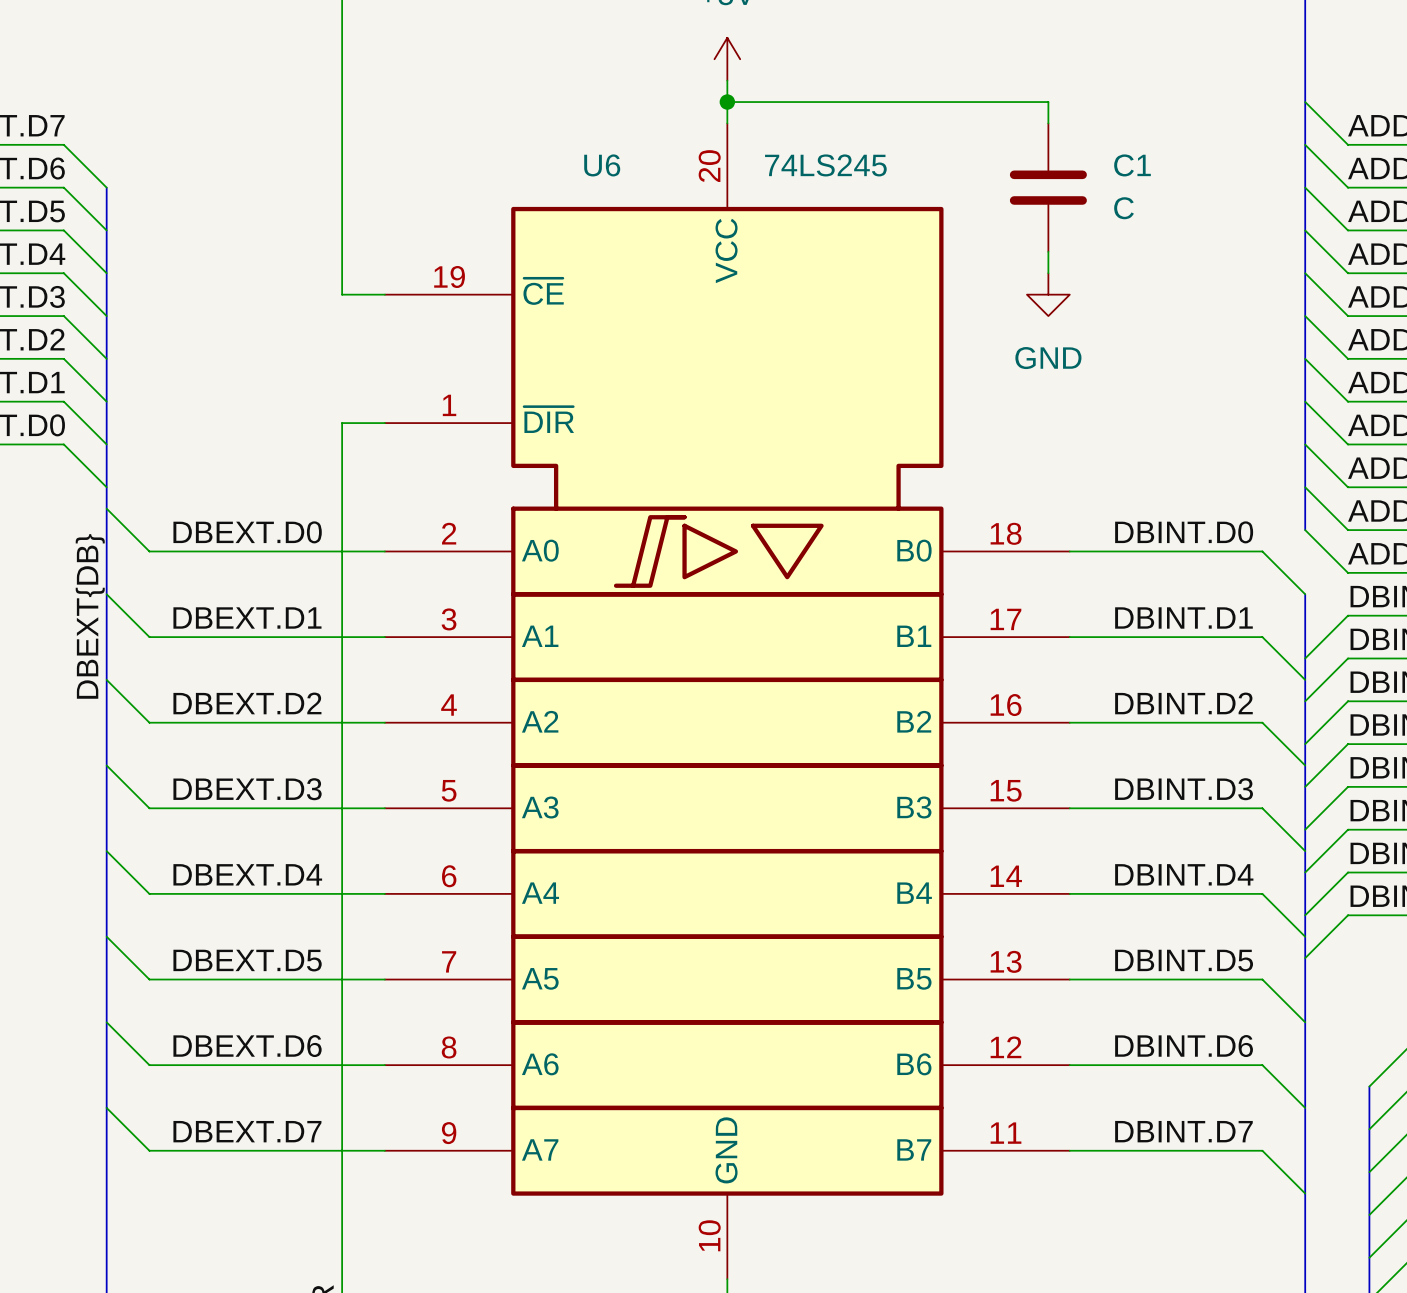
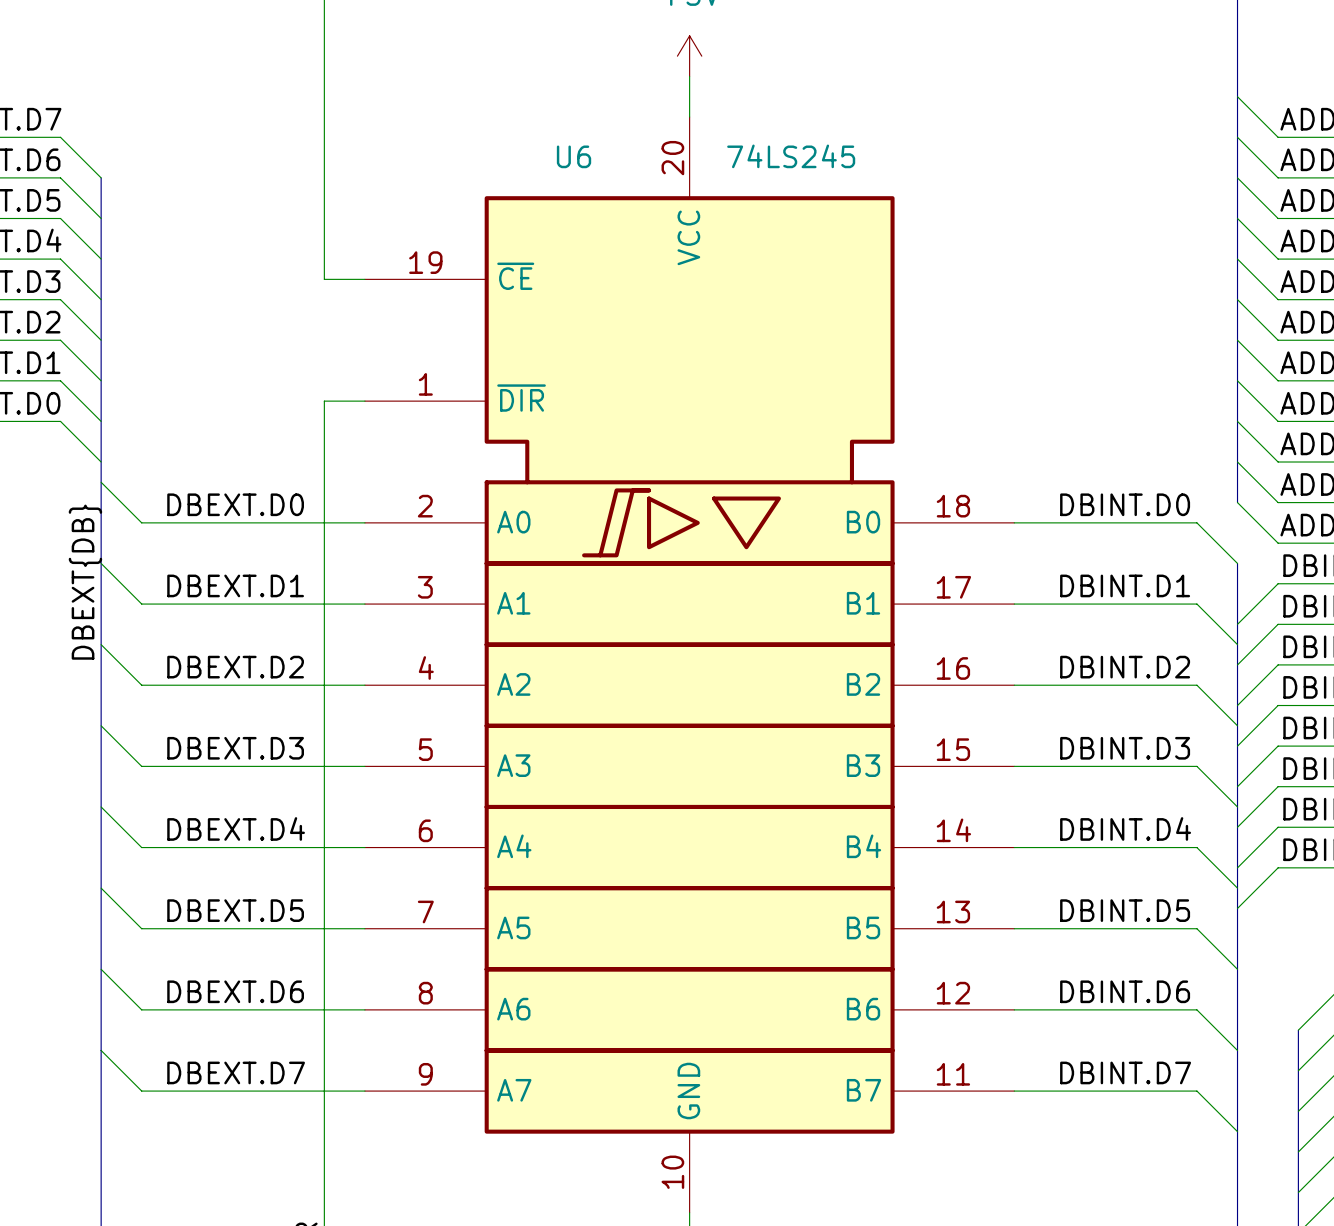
wire: (727, 102) (1048, 102) (1048, 123) -> none
junction: (727, 102) -> none
C1: C (1048, 187) -> none
wire: (1048, 251) (1048, 273) -> none
power symbol: GND (1048, 294) -> none

